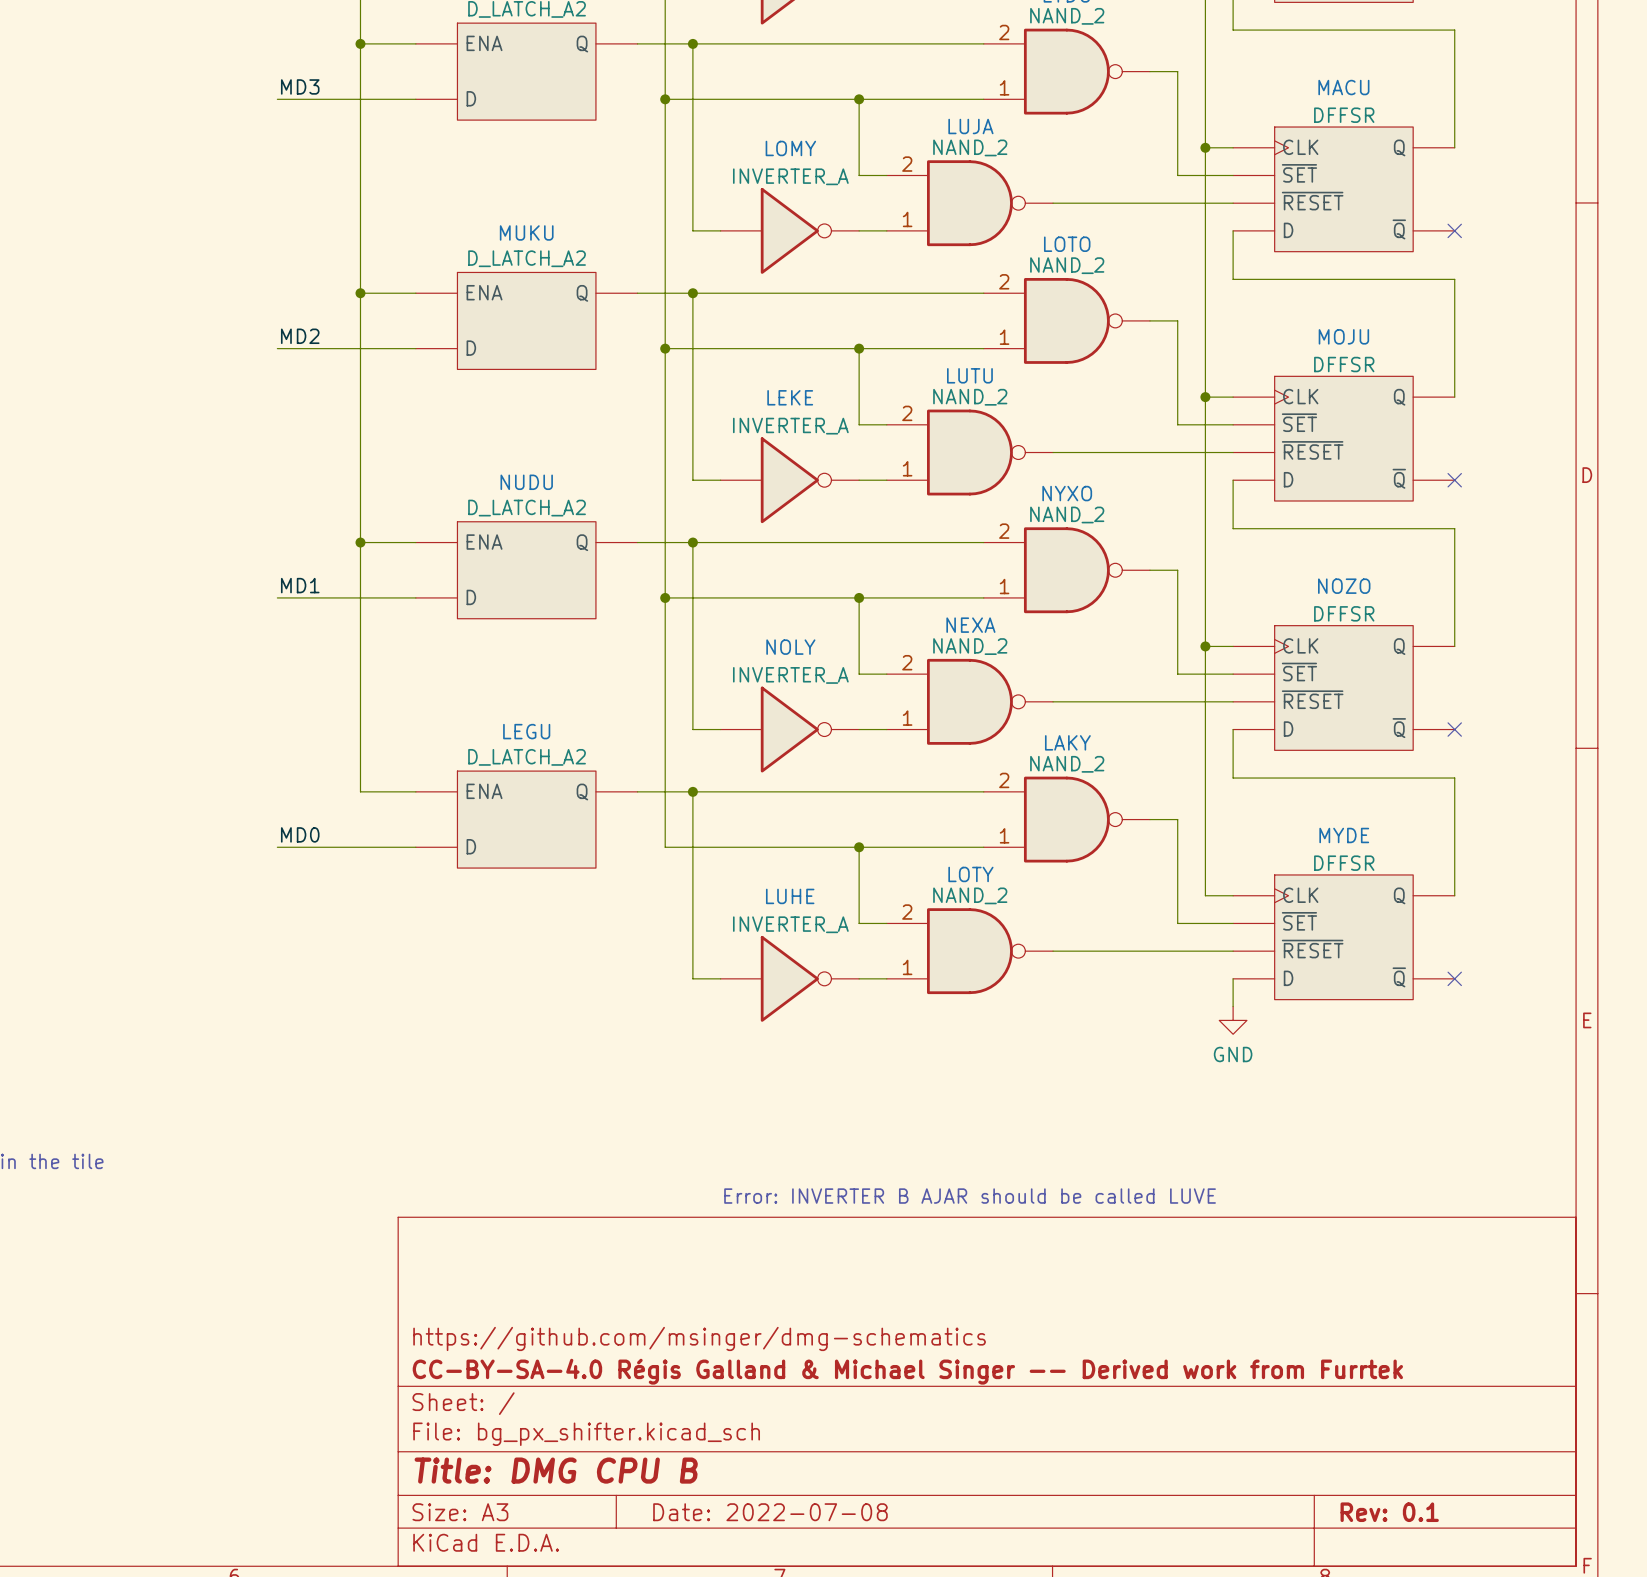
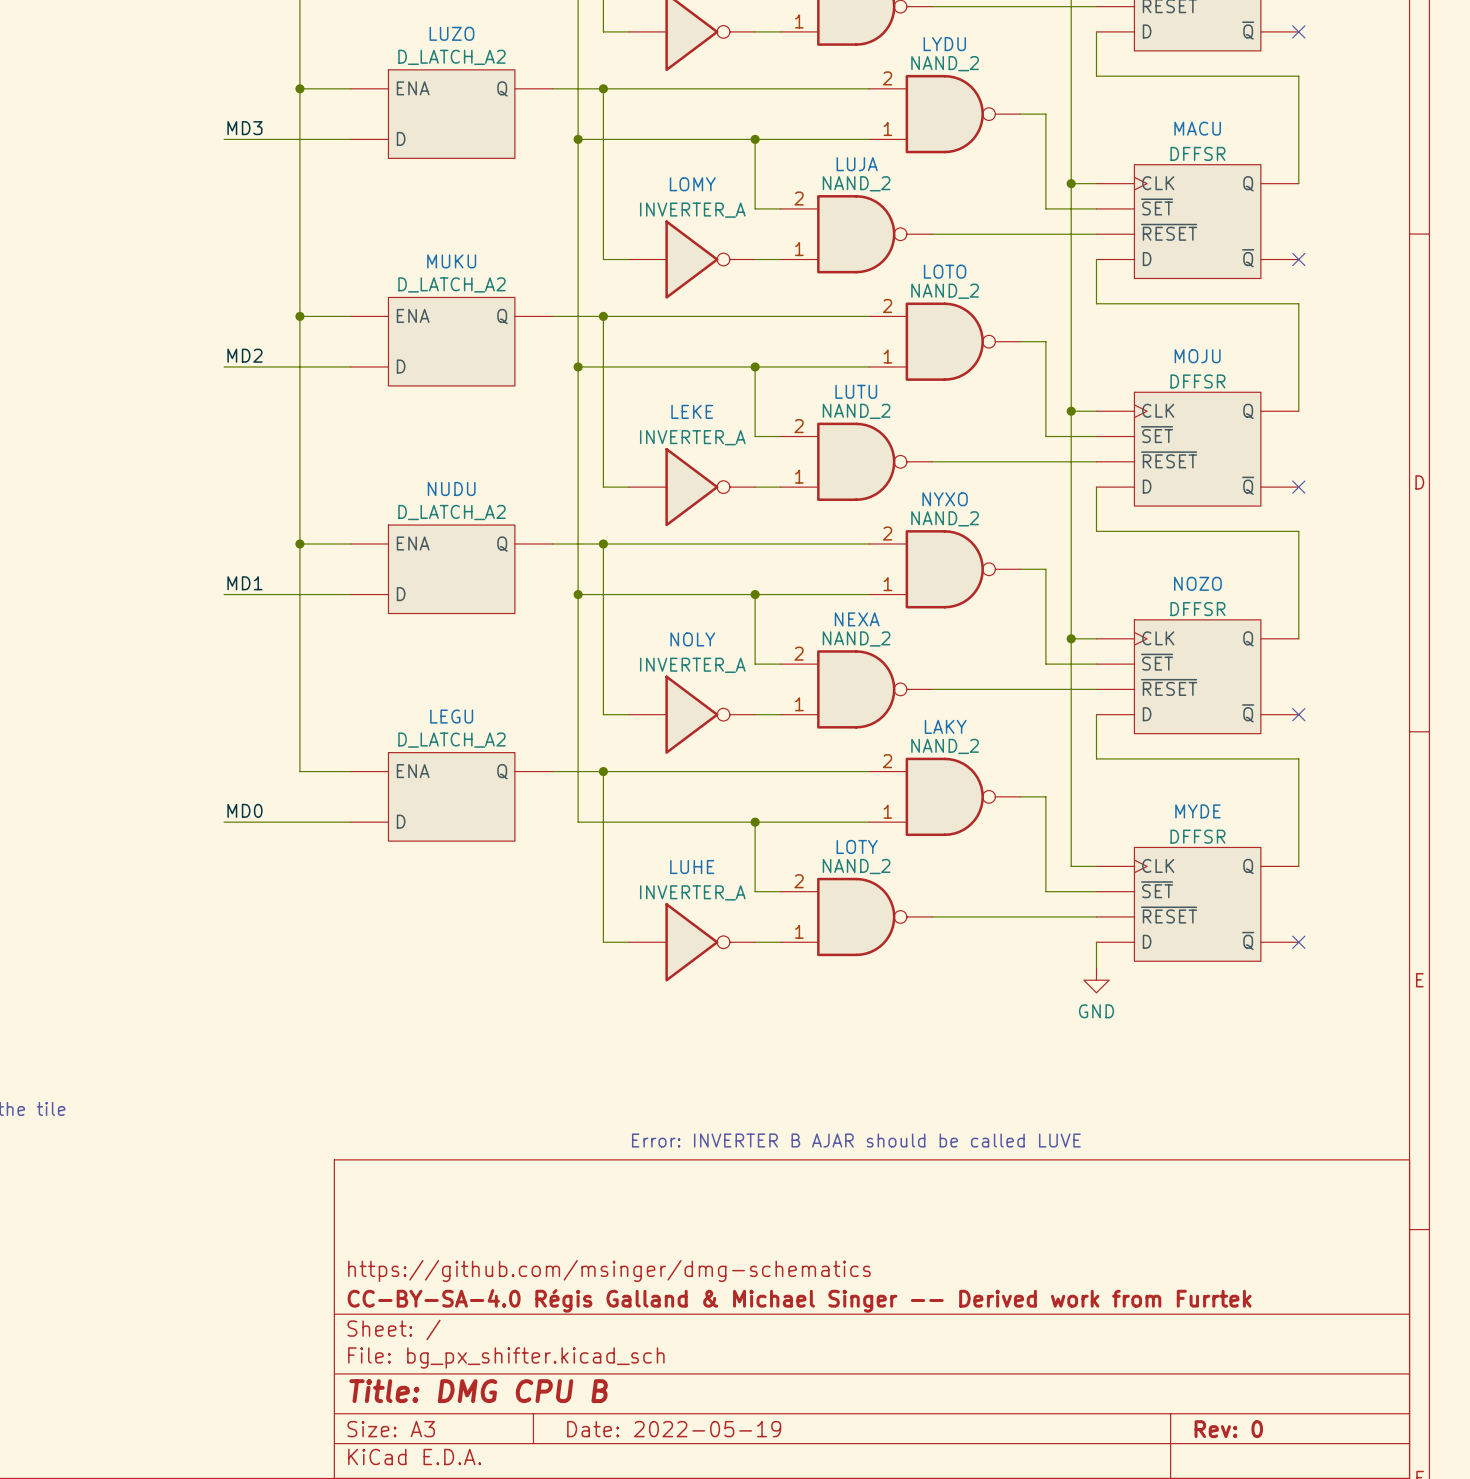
title block: Date: 2022-07-08 (770, 1512) -> Date: 2022-05-19 (674, 1429)
title block: Rev: 0.1 (1389, 1512) -> Rev: 0 (1228, 1429)

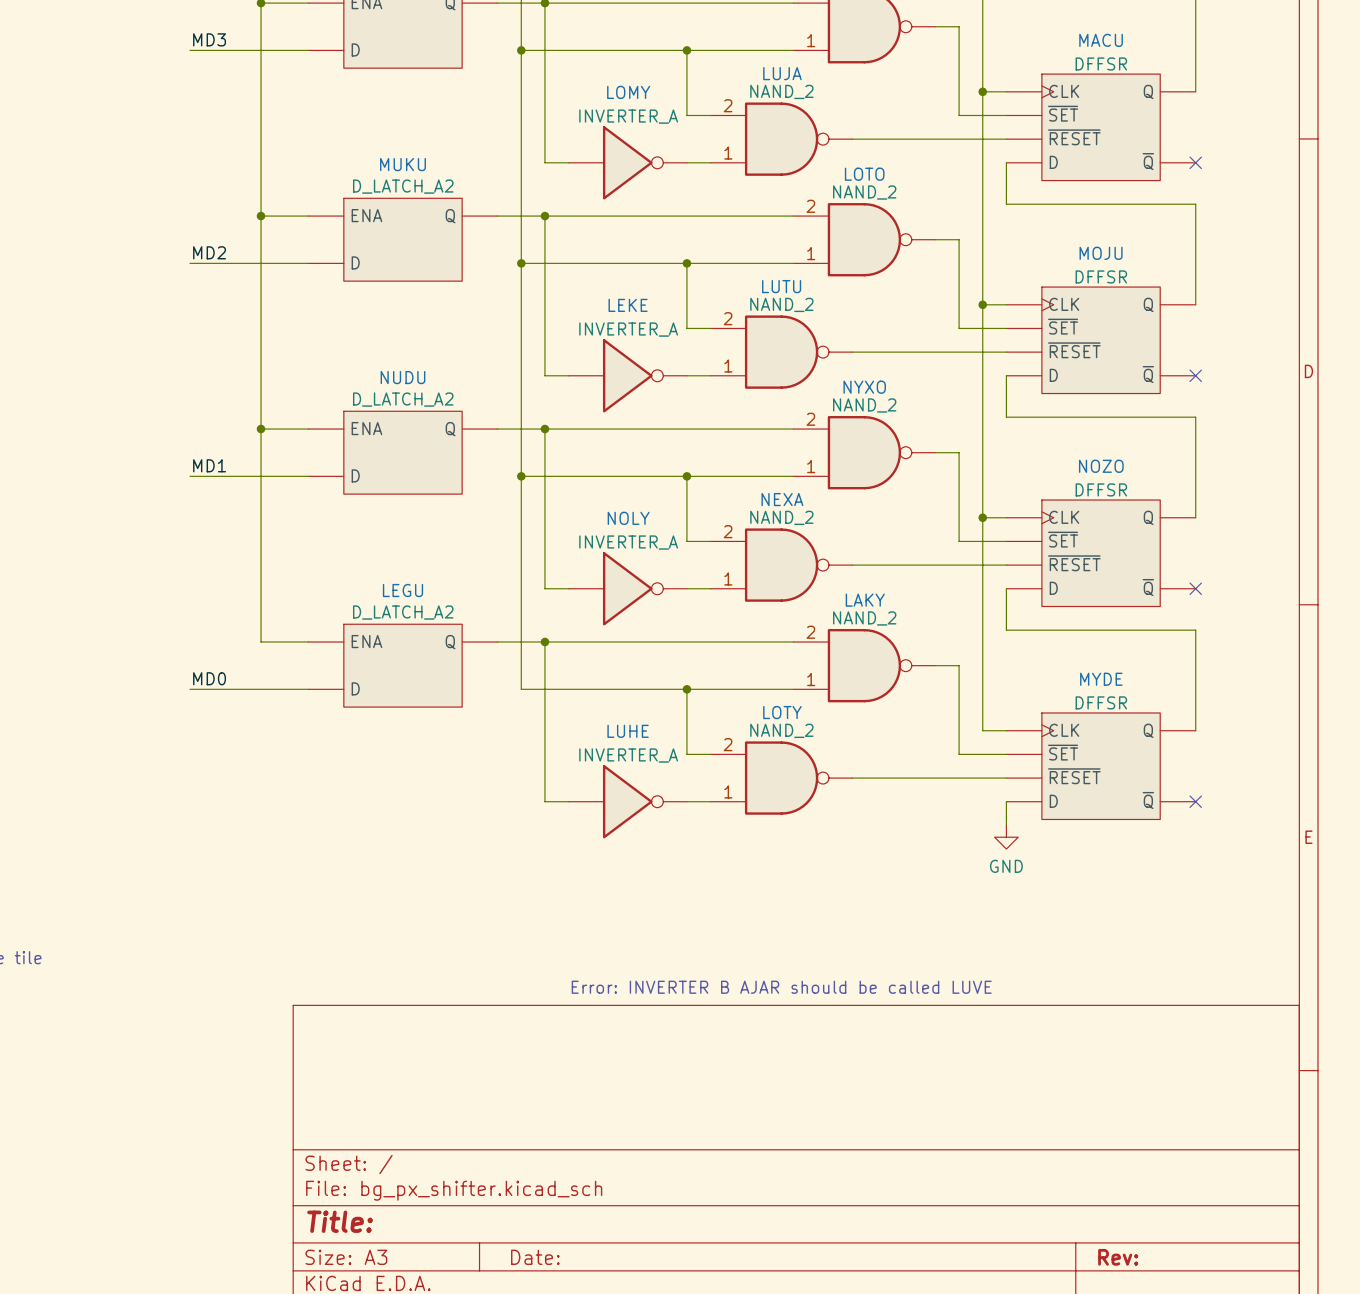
title block: https://github.com/msinger/dmg-schematics (609, 1270) -> none
title block: CC-BY-SA-4.0 Régis Galland & Michael Singer -- Derived work from Furrtek (799, 1300) -> none
title block: Title: DMG CPU B (478, 1391) -> Title: (340, 1221)
title block: Date: 2022-05-19 (674, 1429) -> Date: (535, 1257)
title block: Rev: 0 (1228, 1429) -> Rev: (1118, 1257)

